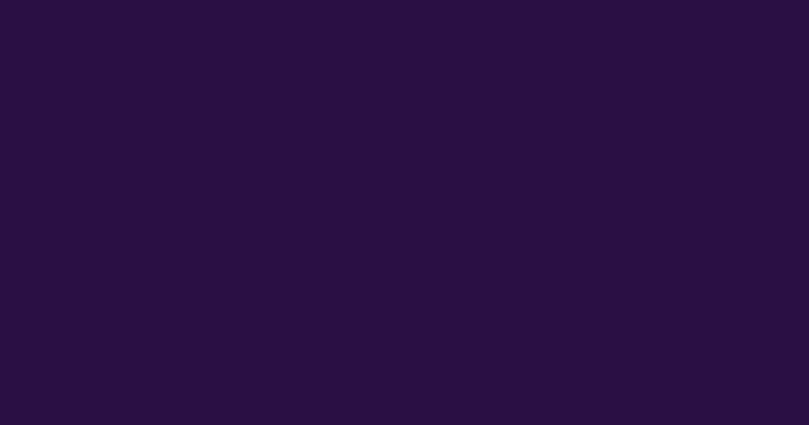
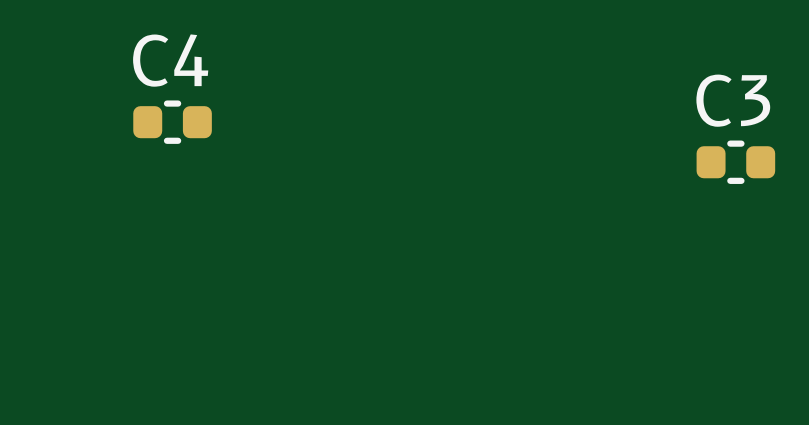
C4: none -> (172, 122)
C3: none -> (735, 162)

